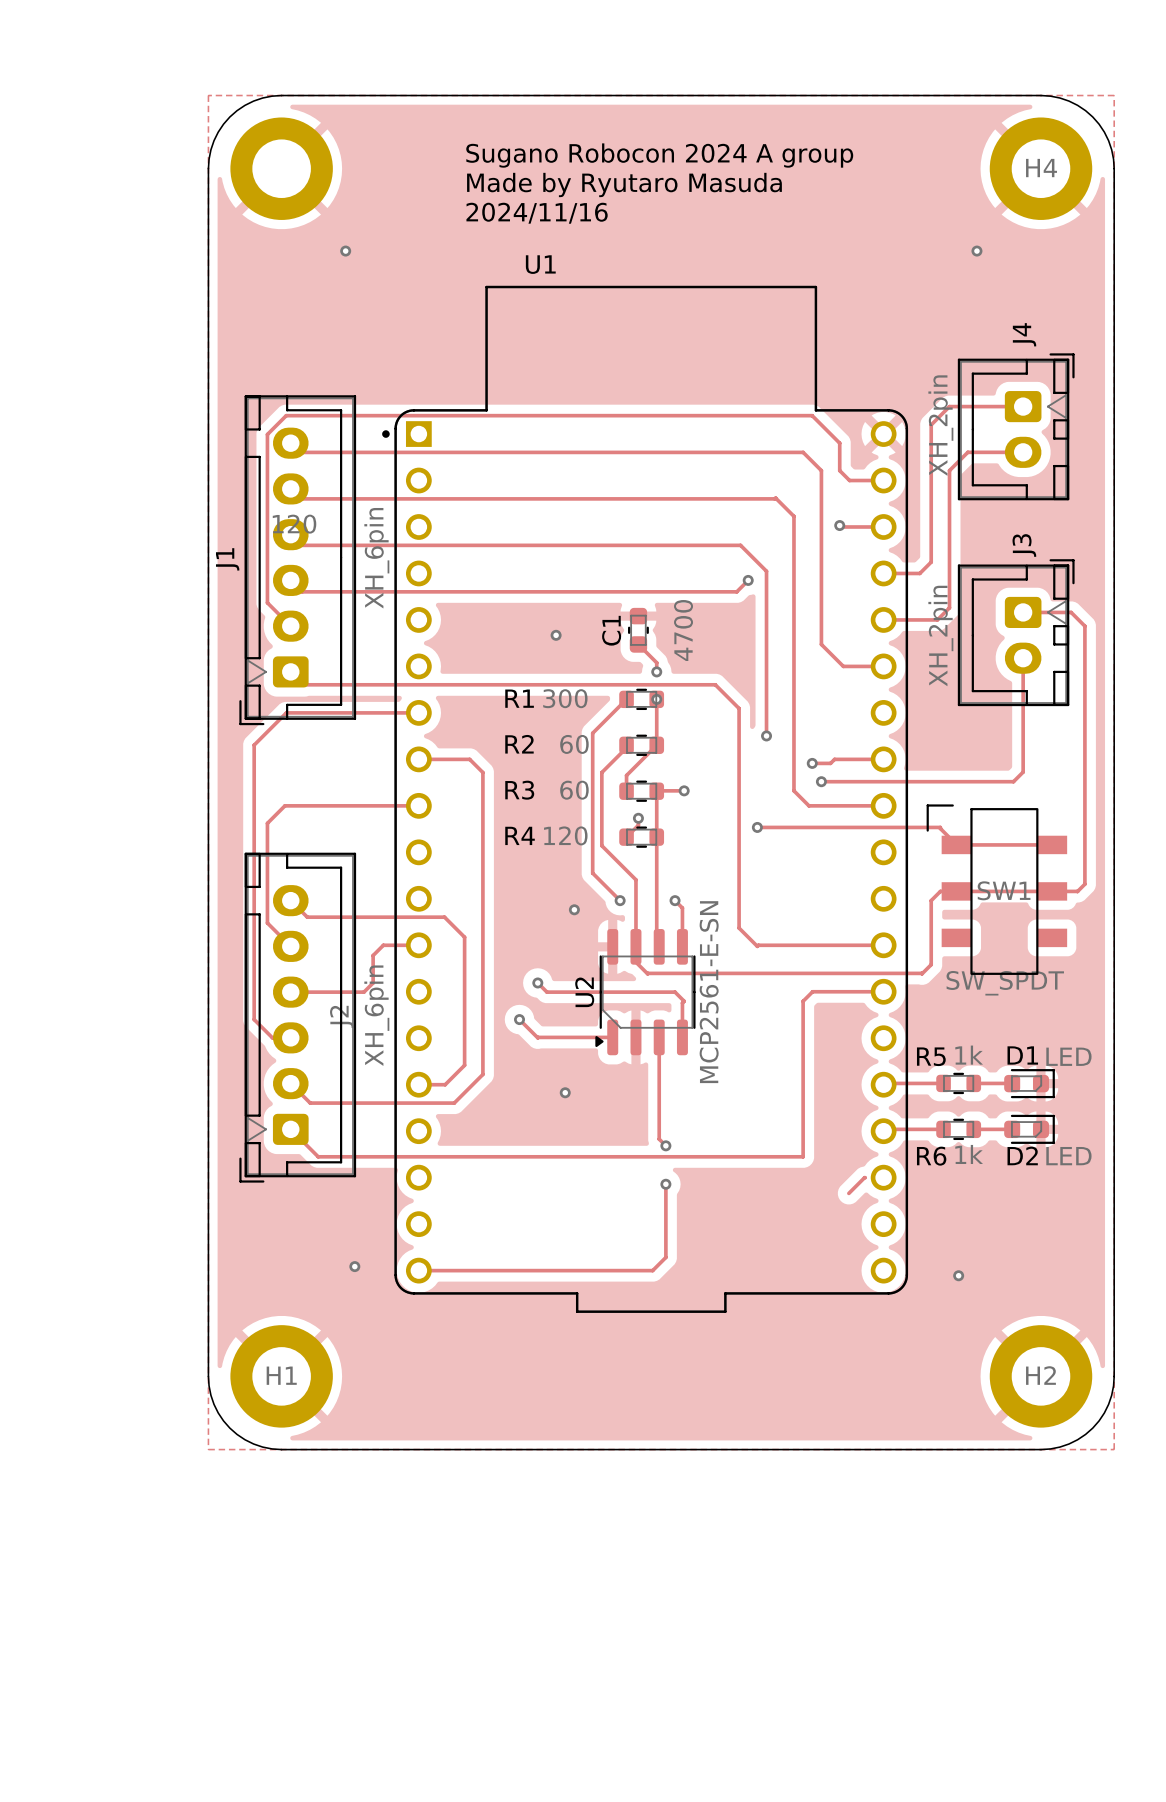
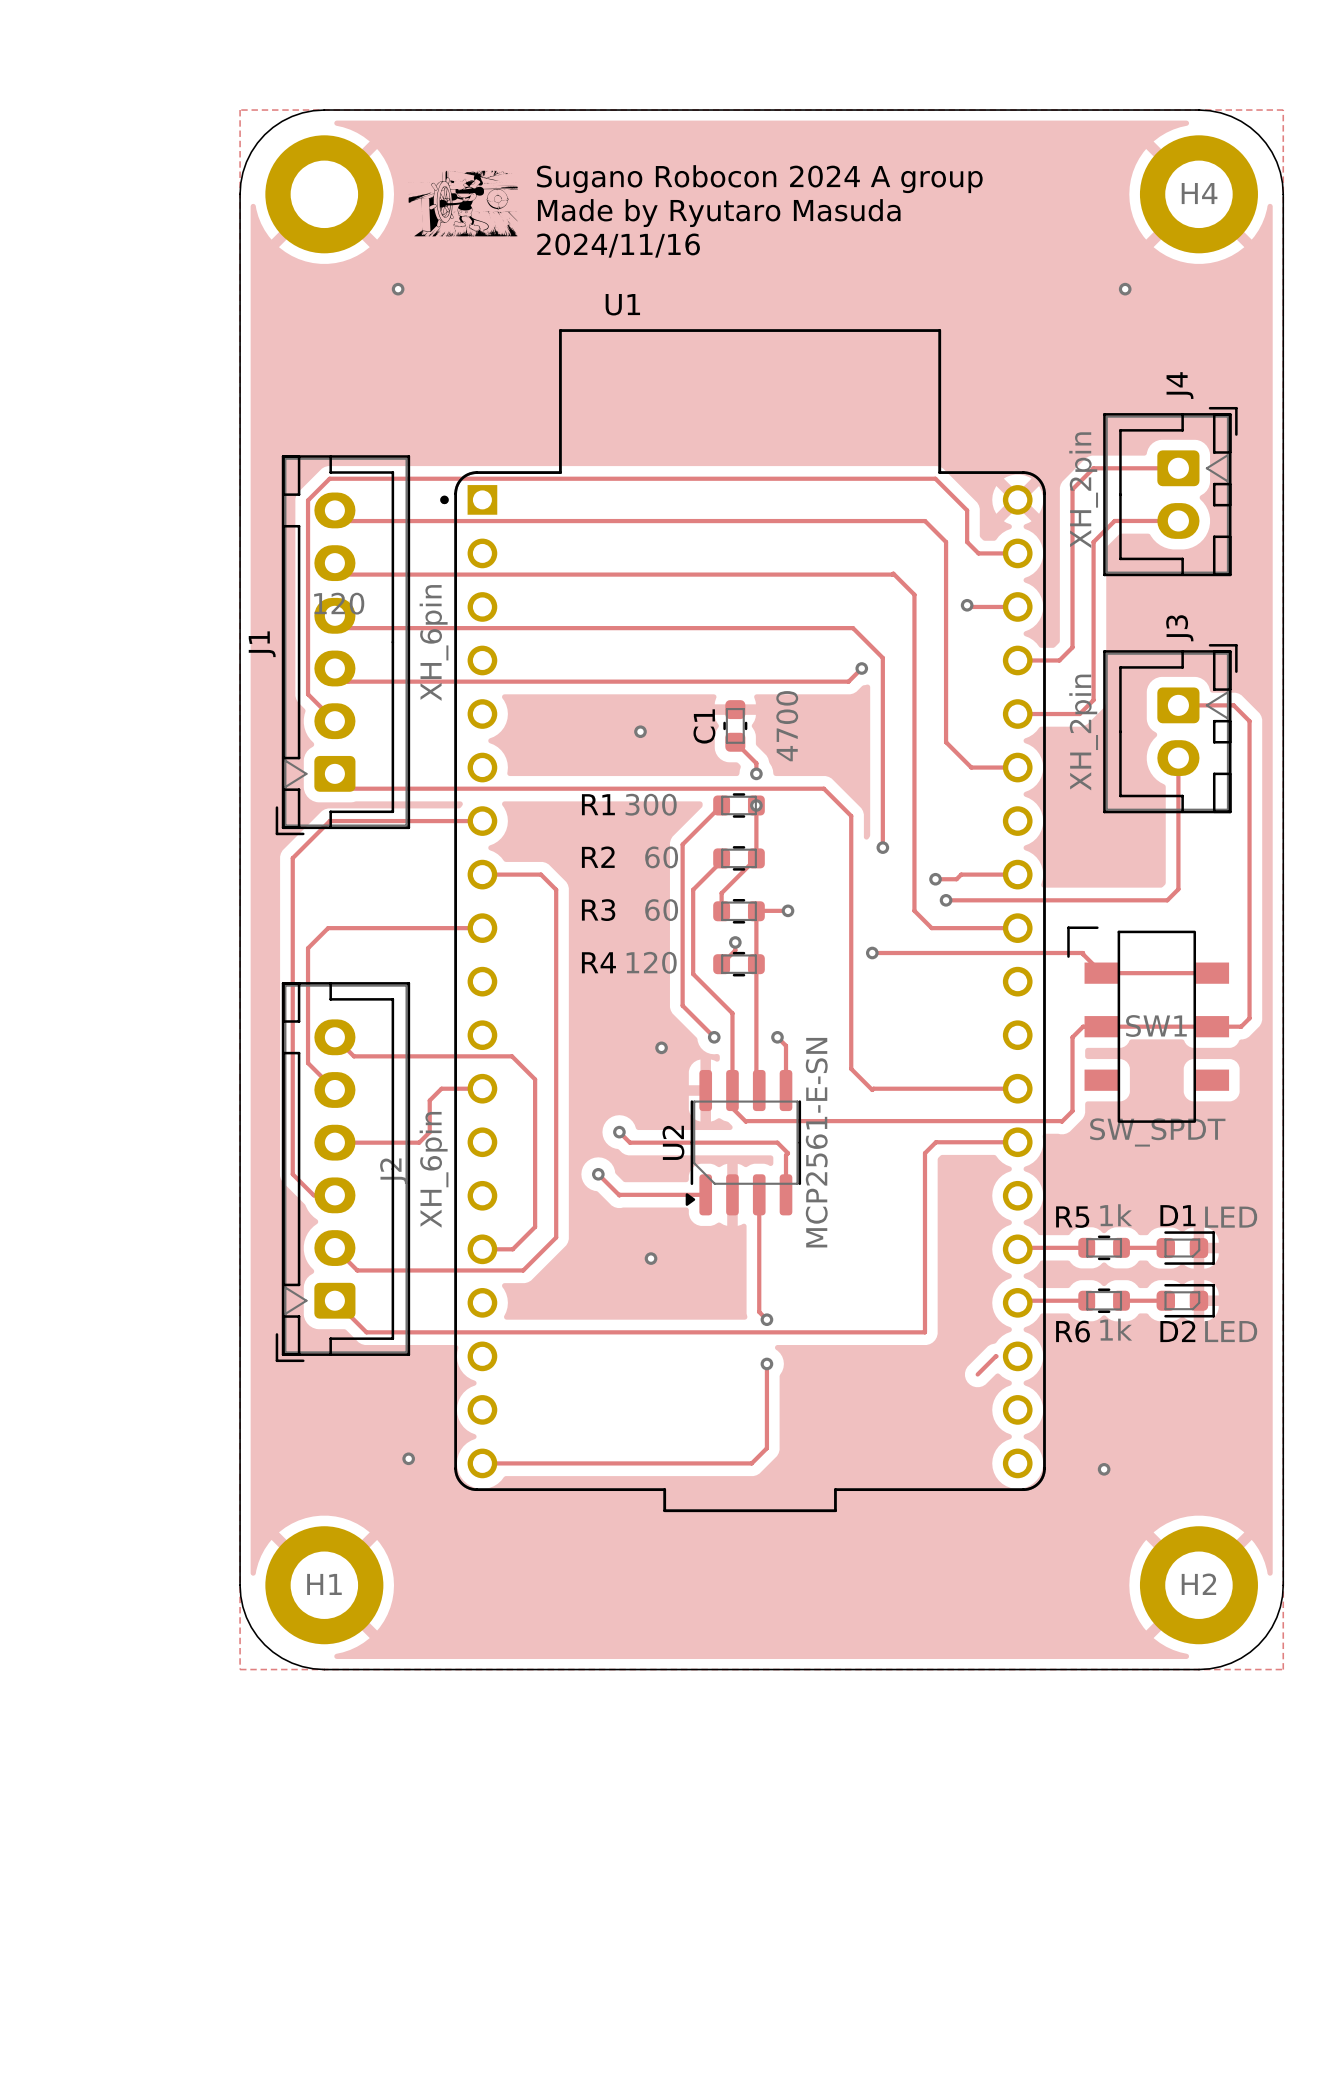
drawing: none -> [408, 170, 518, 237]

